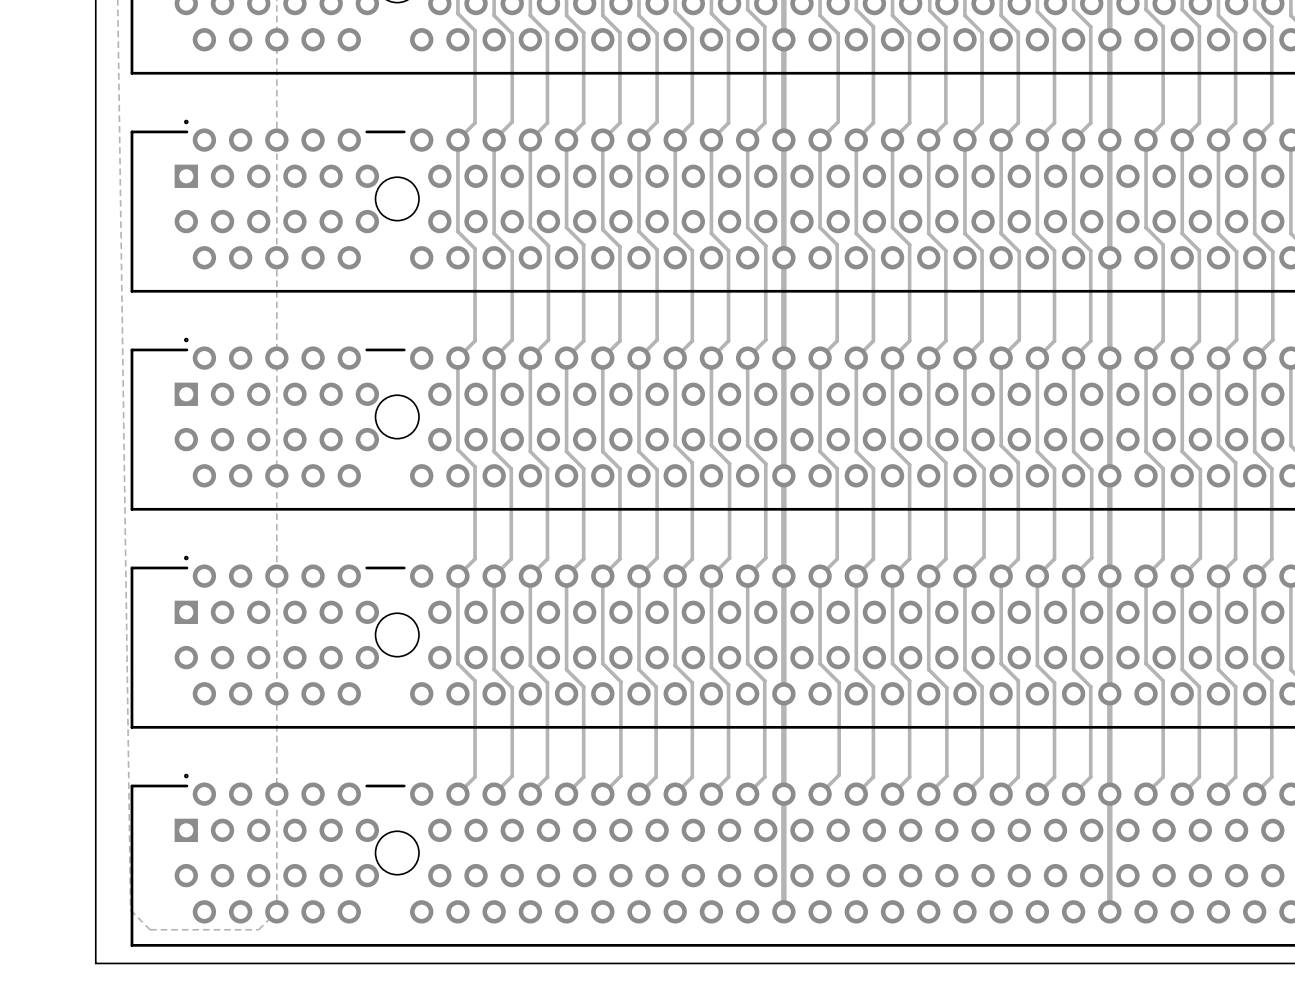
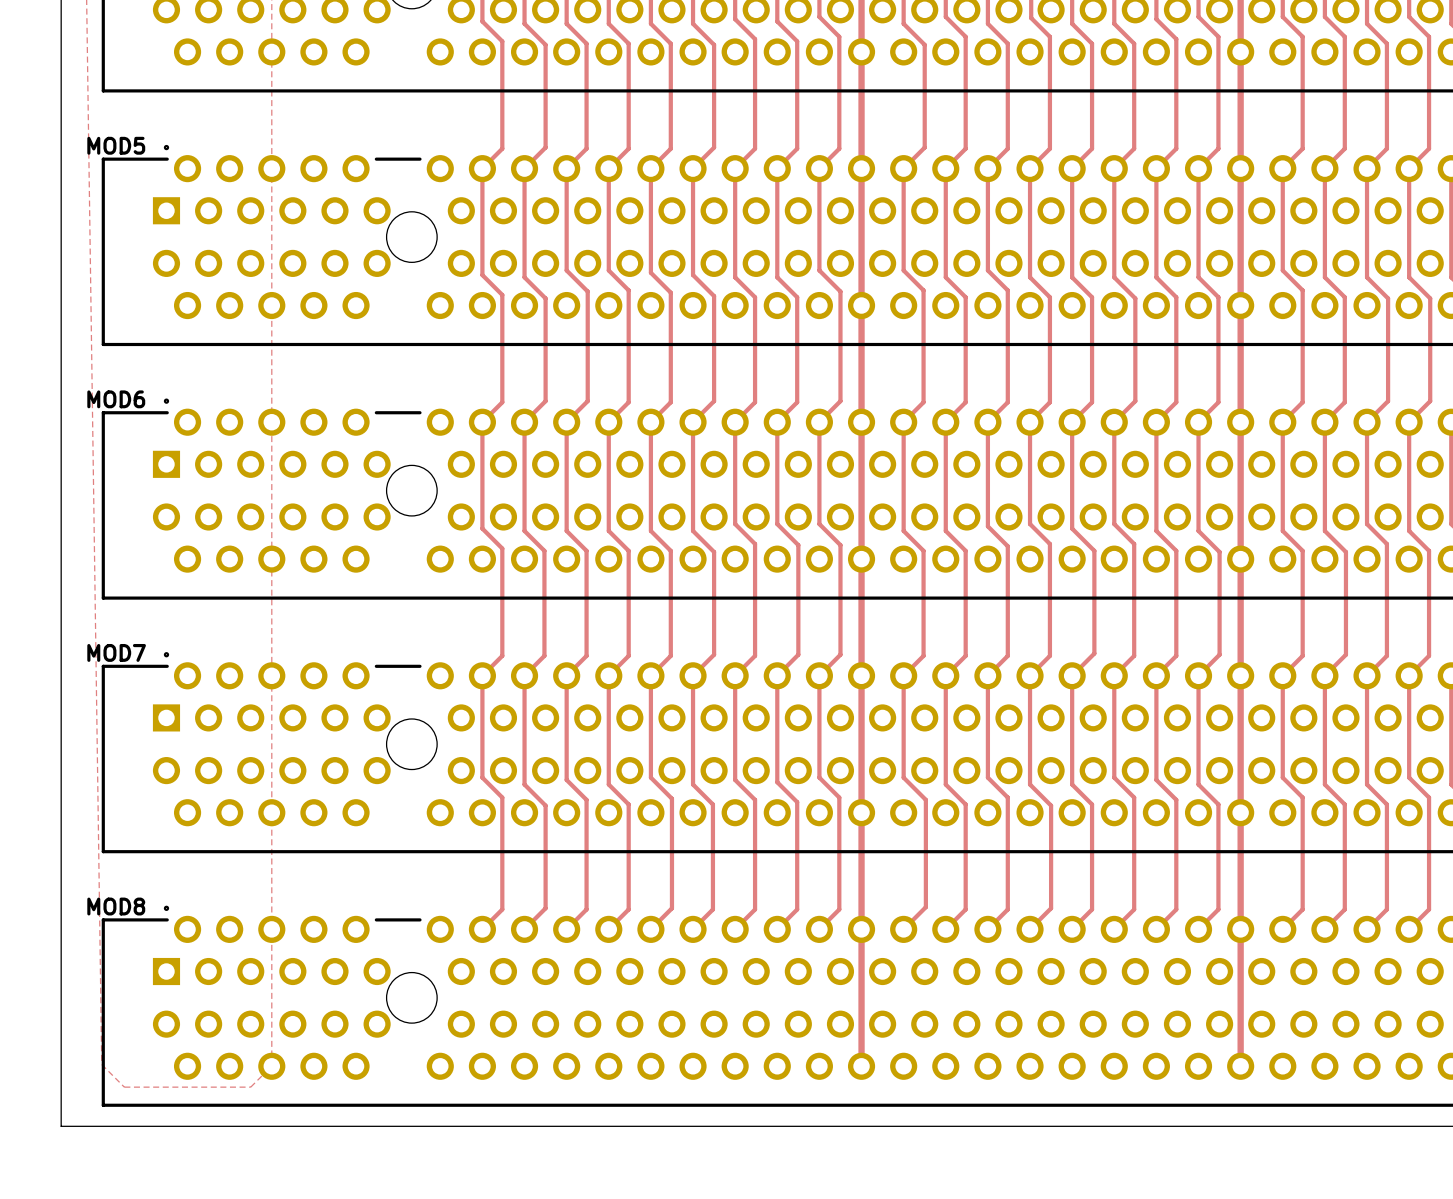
MOD5 name: none -> MOD5 (116, 145)
MOD6 name: none -> MOD6 (116, 399)
MOD7 name: none -> MOD7 (116, 652)
MOD8 name: none -> MOD8 (116, 906)

